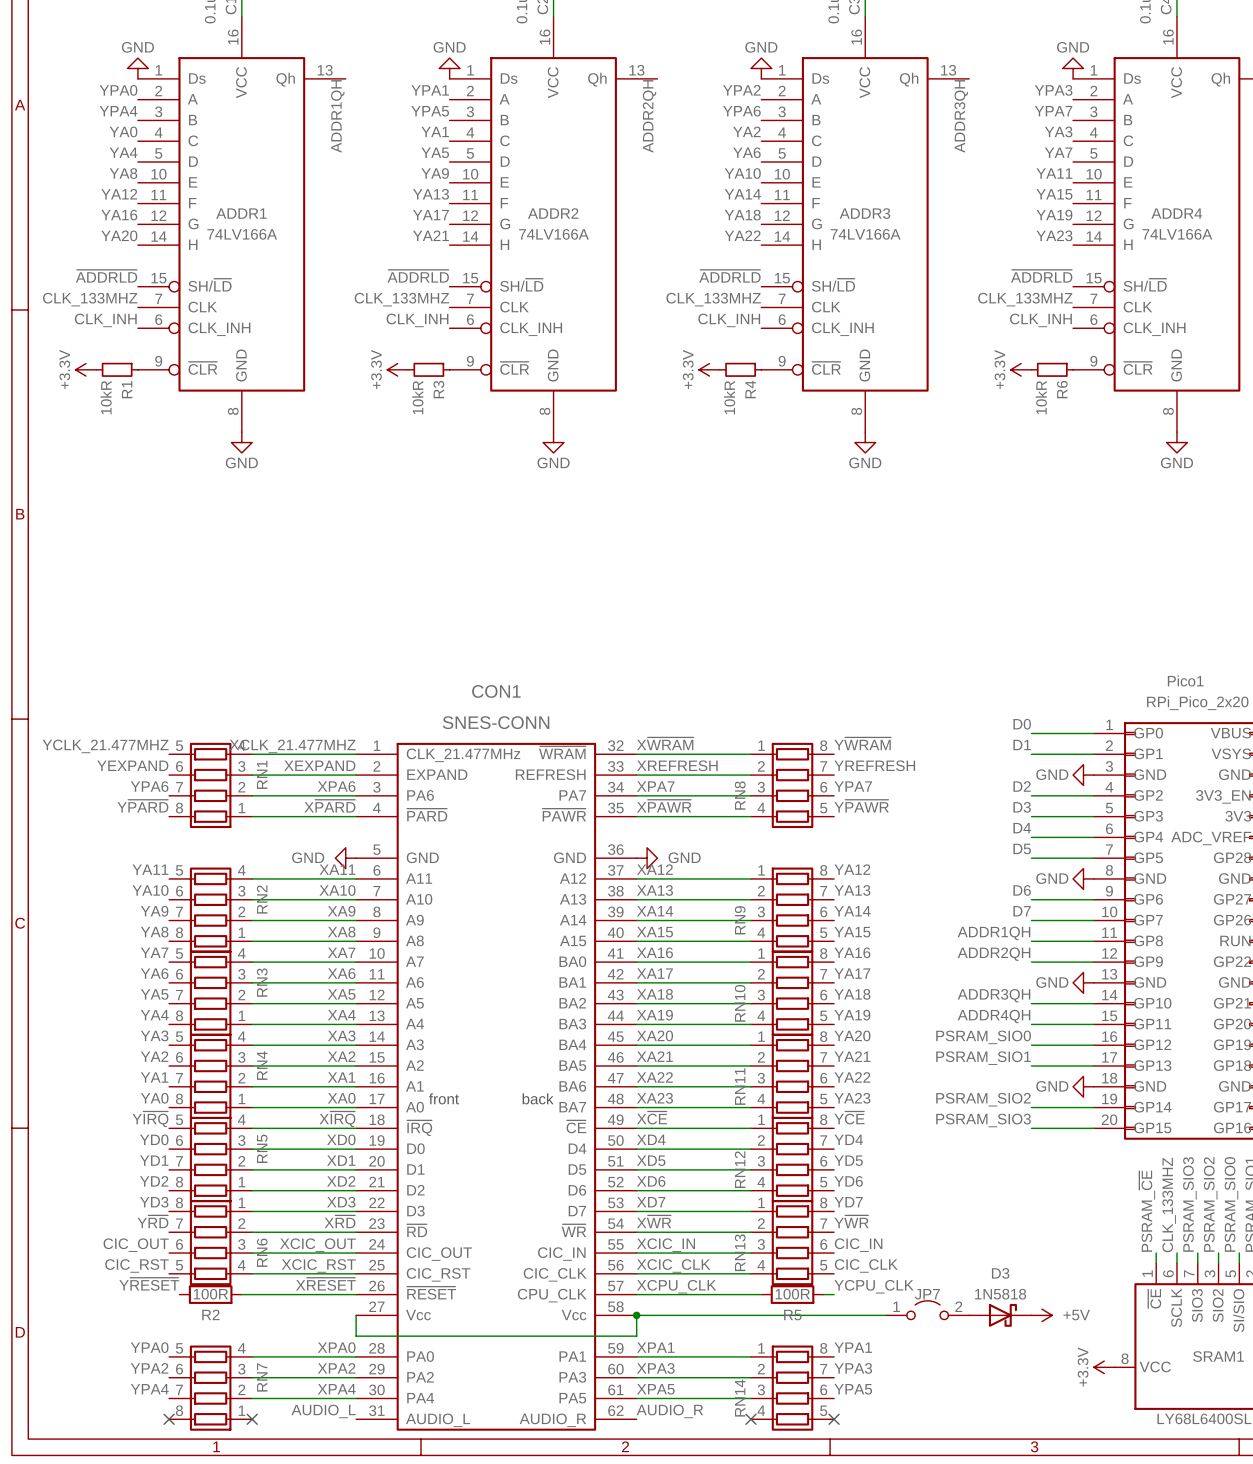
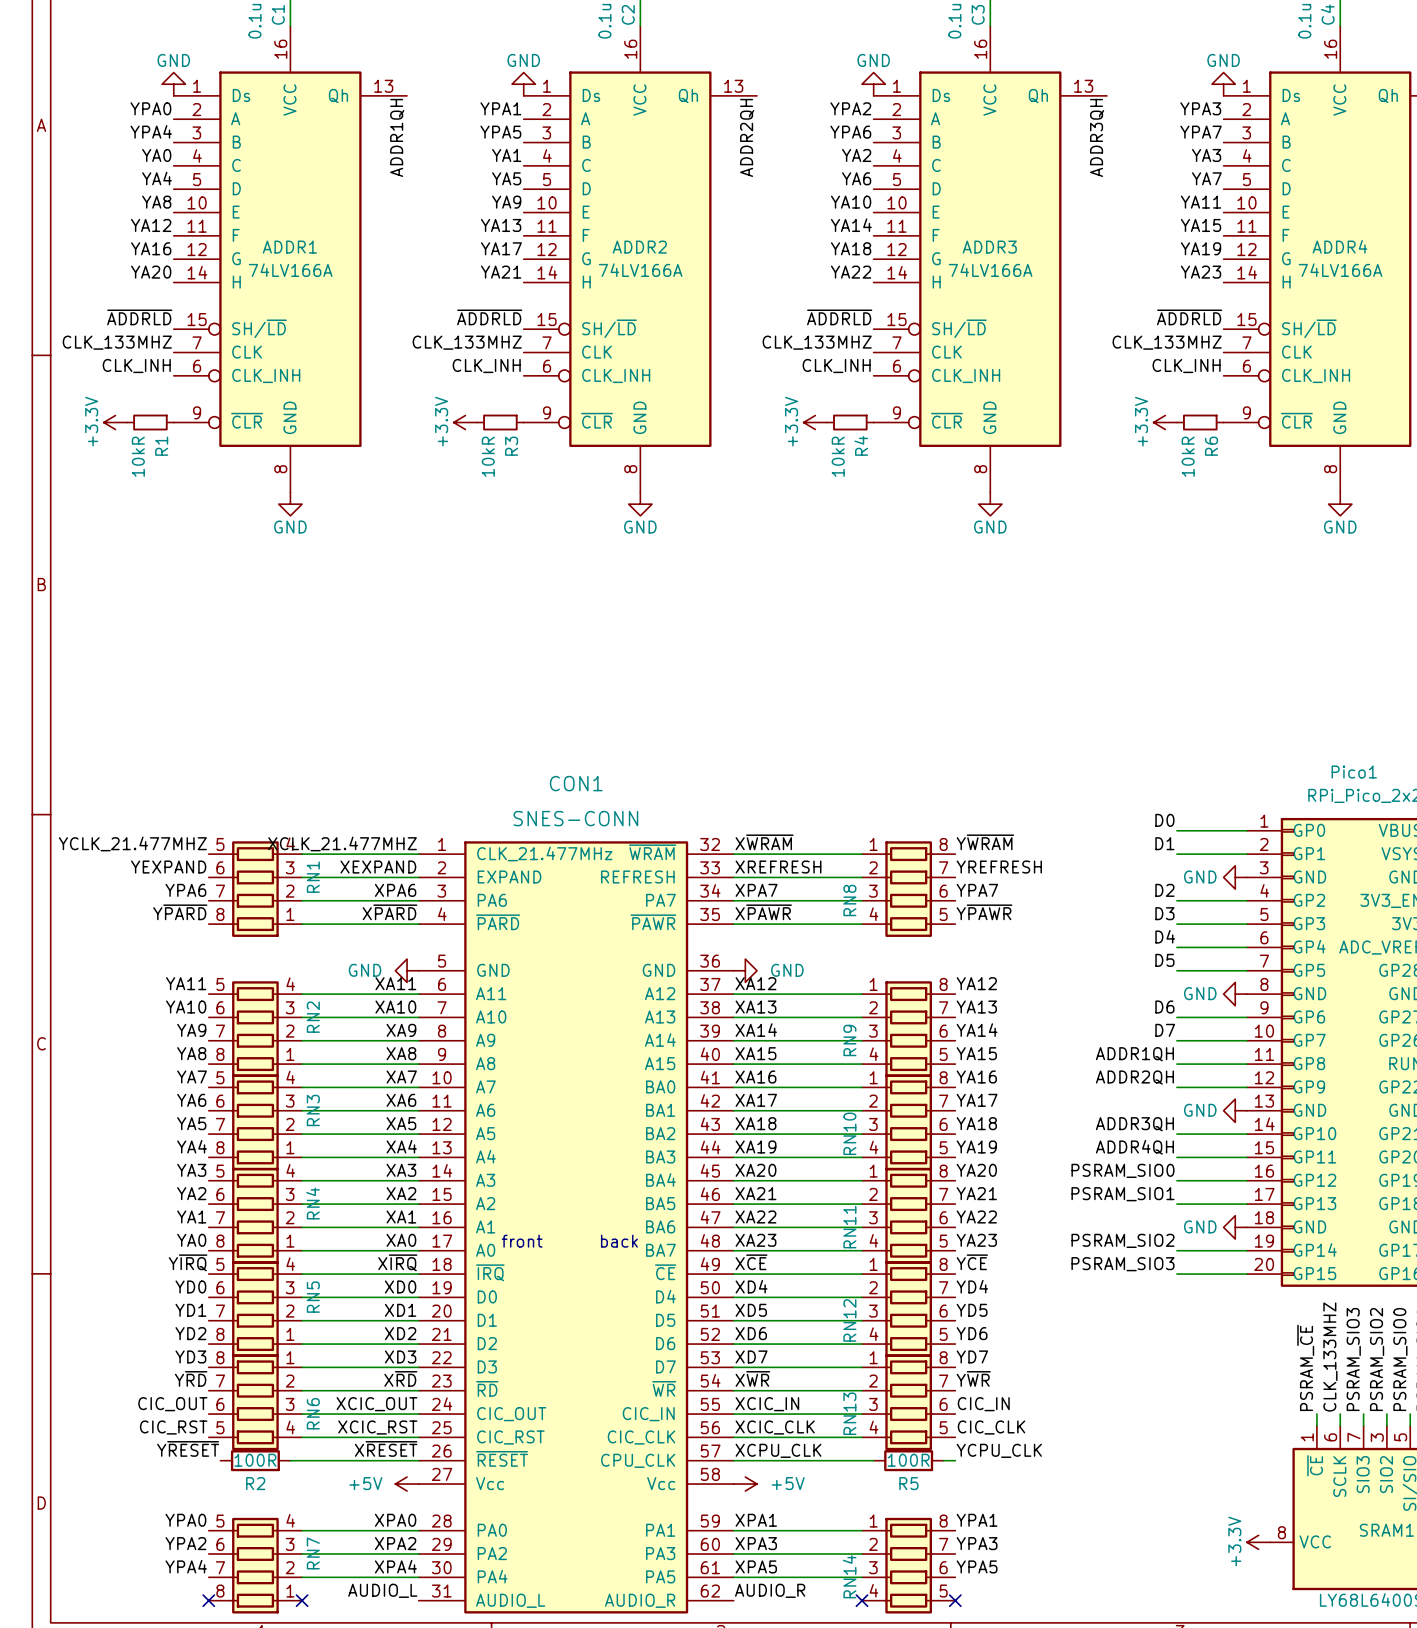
JP7: (927, 1310) -> none
power symbol: none -> +5V (407, 1484)
wire: (356, 1315) (356, 1336) (636, 1336) (636, 1315) (886, 1315) -> none
junction: (636, 1315) -> none
power symbol: none -> +5V (745, 1484)
D3: 1N5818 (1000, 1315) -> none
power symbol: +5V (1041, 1315) -> none

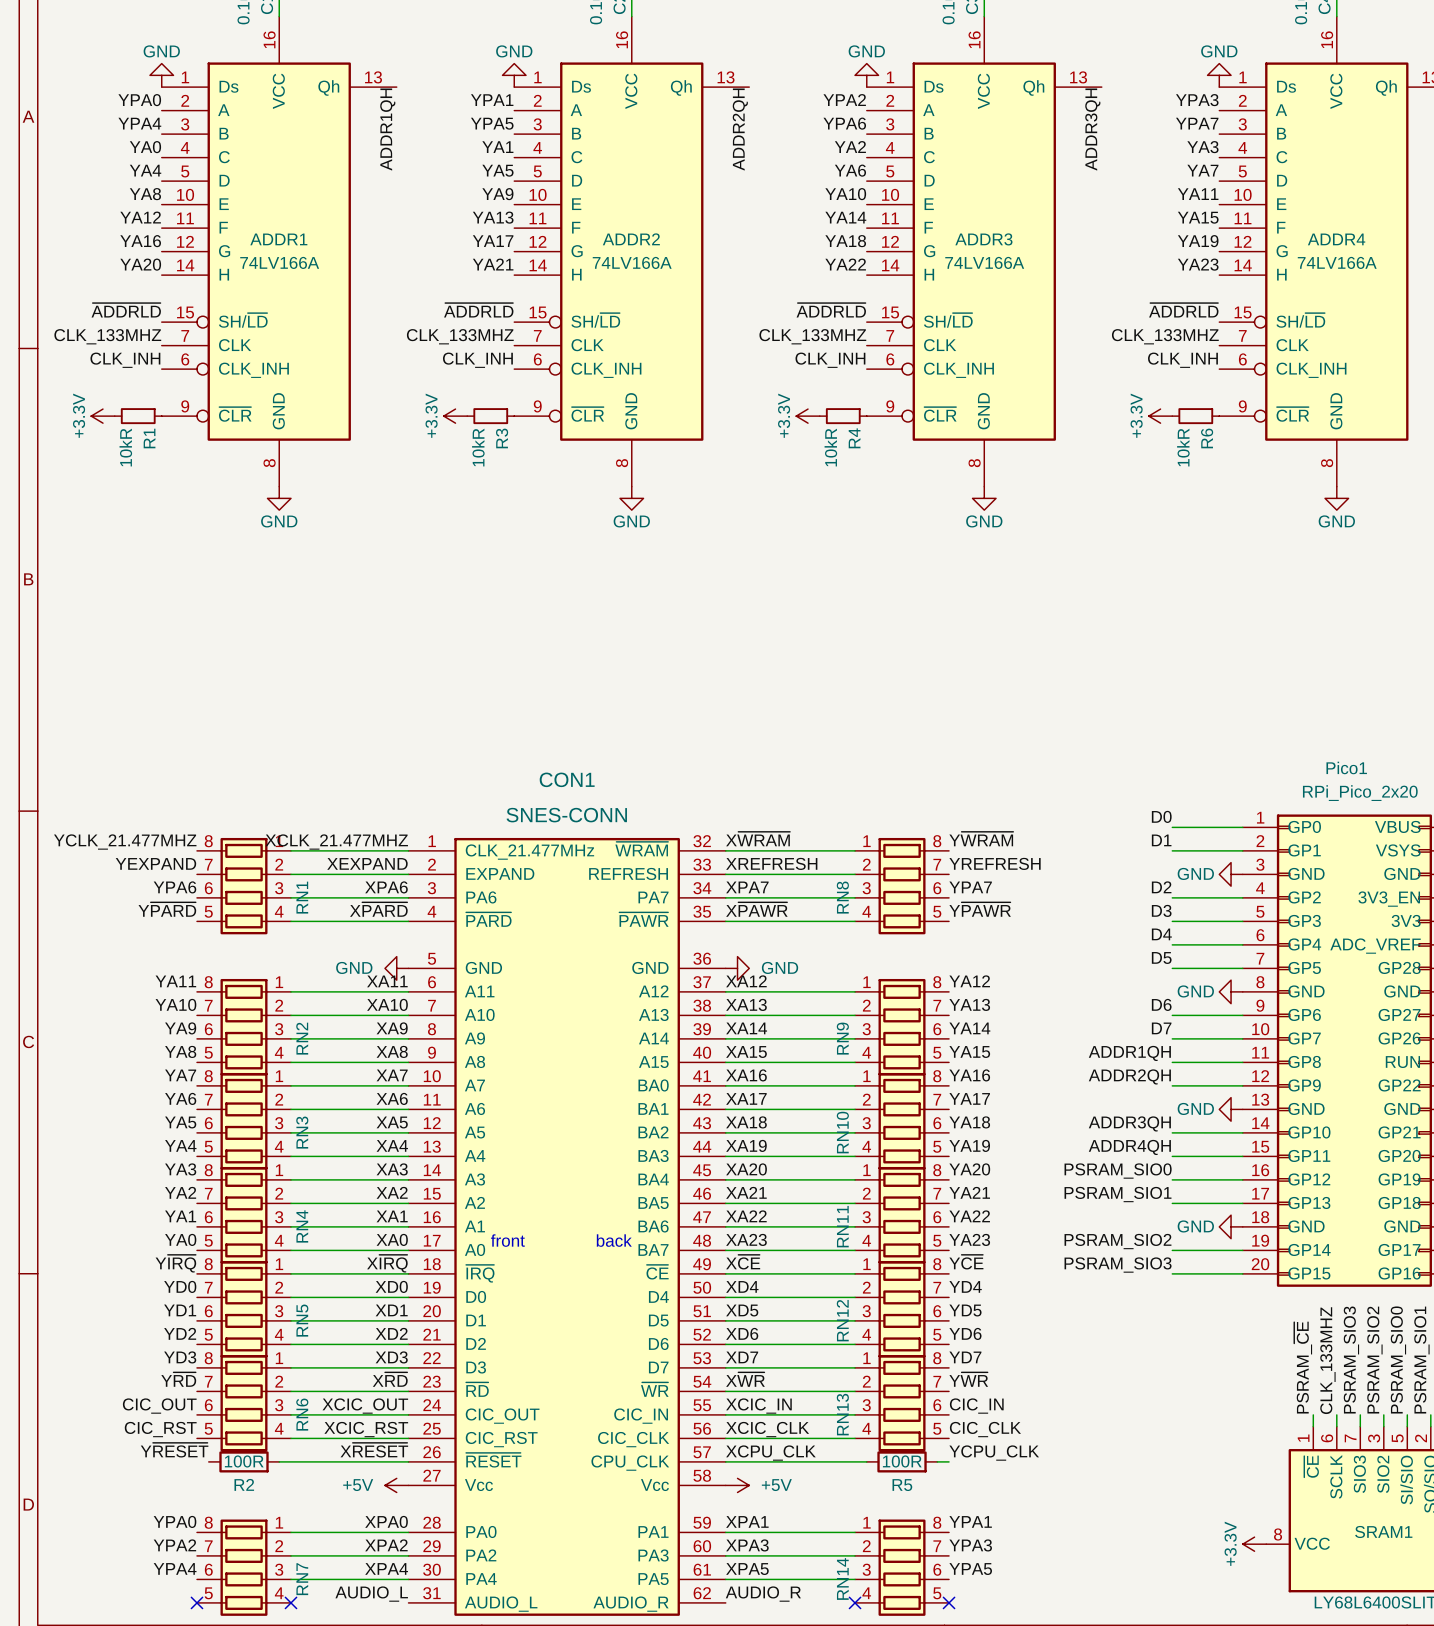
RN1 flip: as is (255, 889) -> up-down (243, 886)
RN2 flip: as is (255, 1029) -> up-down (243, 1027)
RN3 flip: as is (255, 1122) -> up-down (243, 1121)
RN4 flip: as is (255, 1215) -> up-down (243, 1215)
RN5 flip: as is (255, 1309) -> up-down (243, 1309)
RN7 flip: as is (255, 1565) -> up-down (243, 1567)

